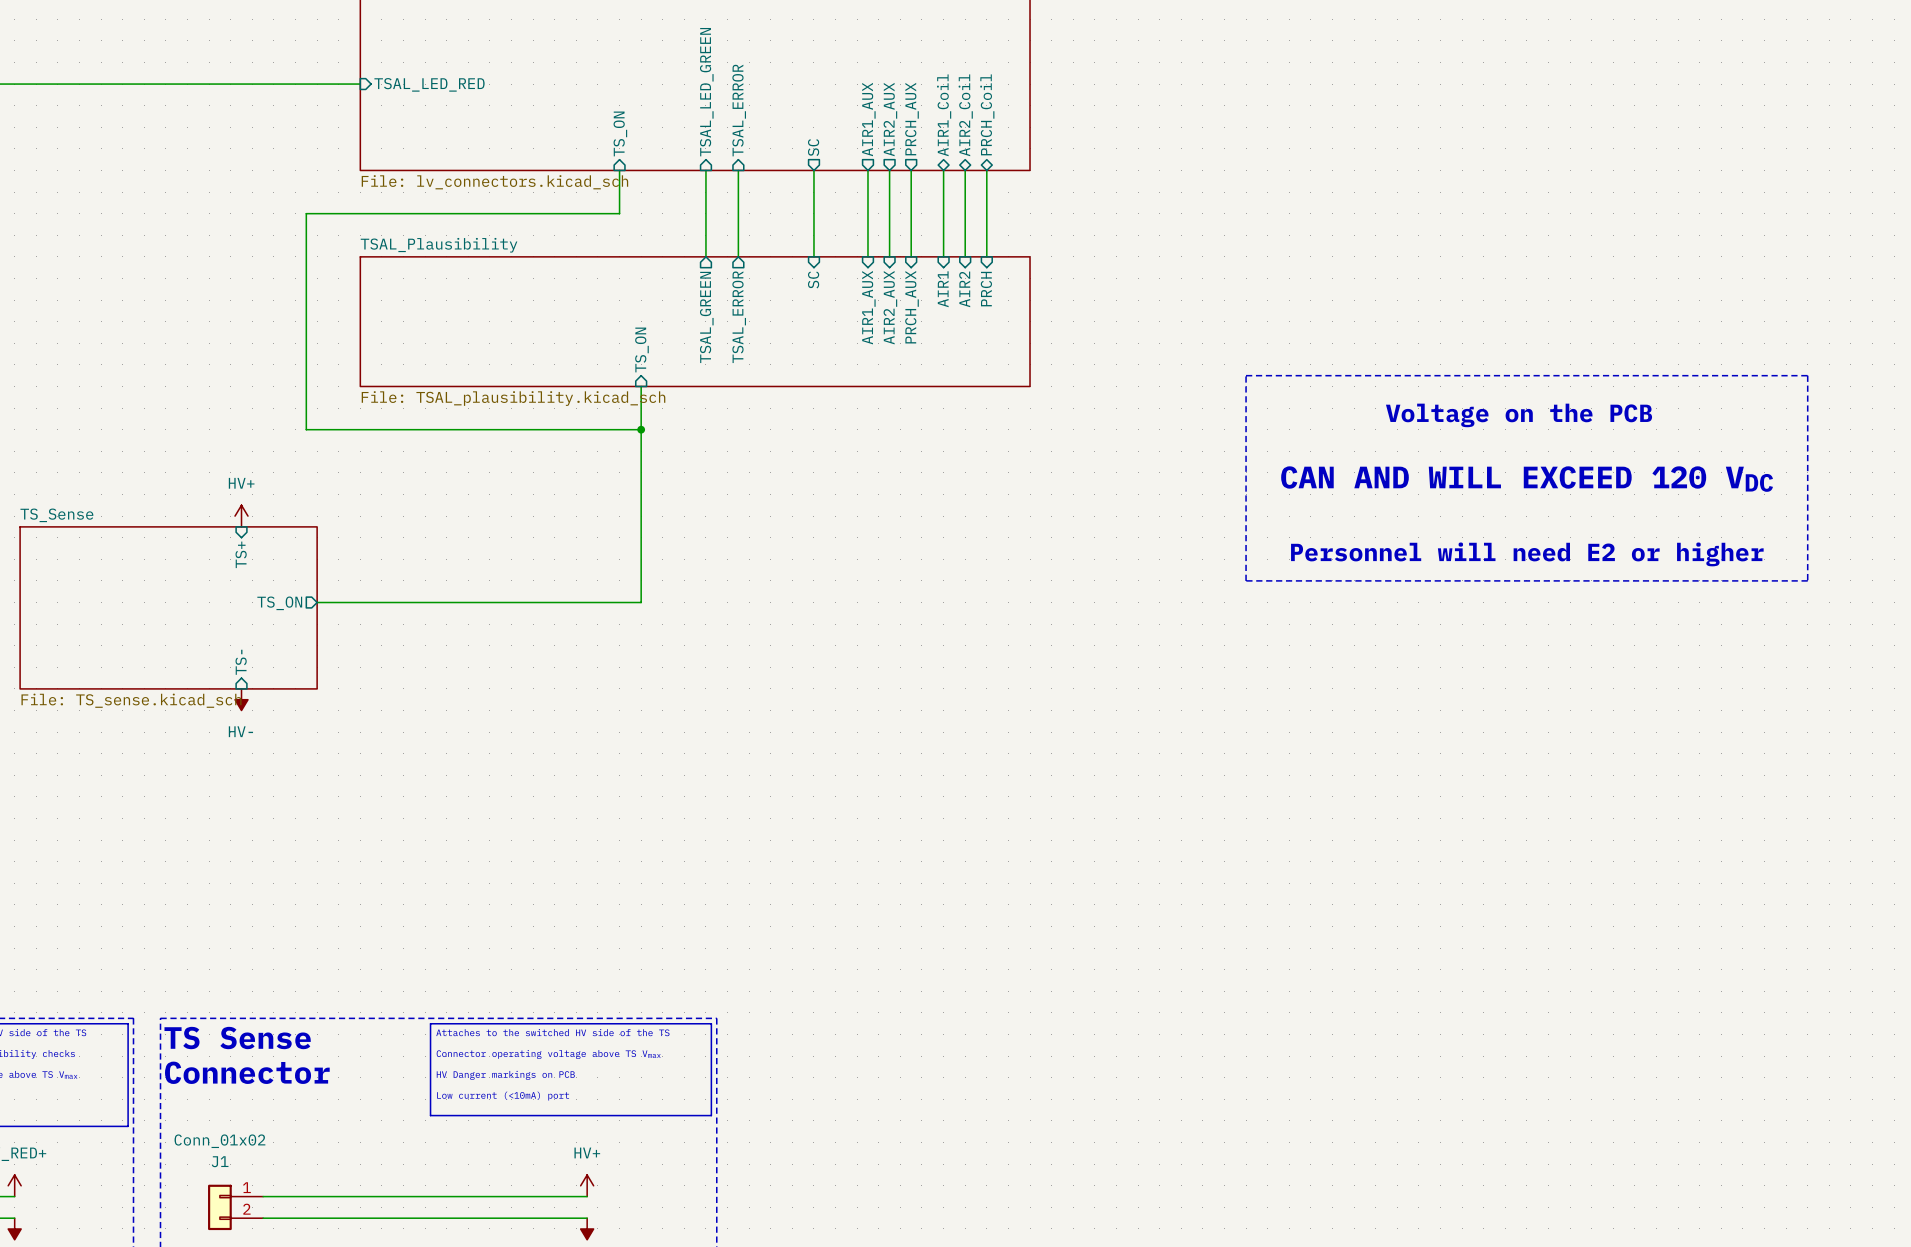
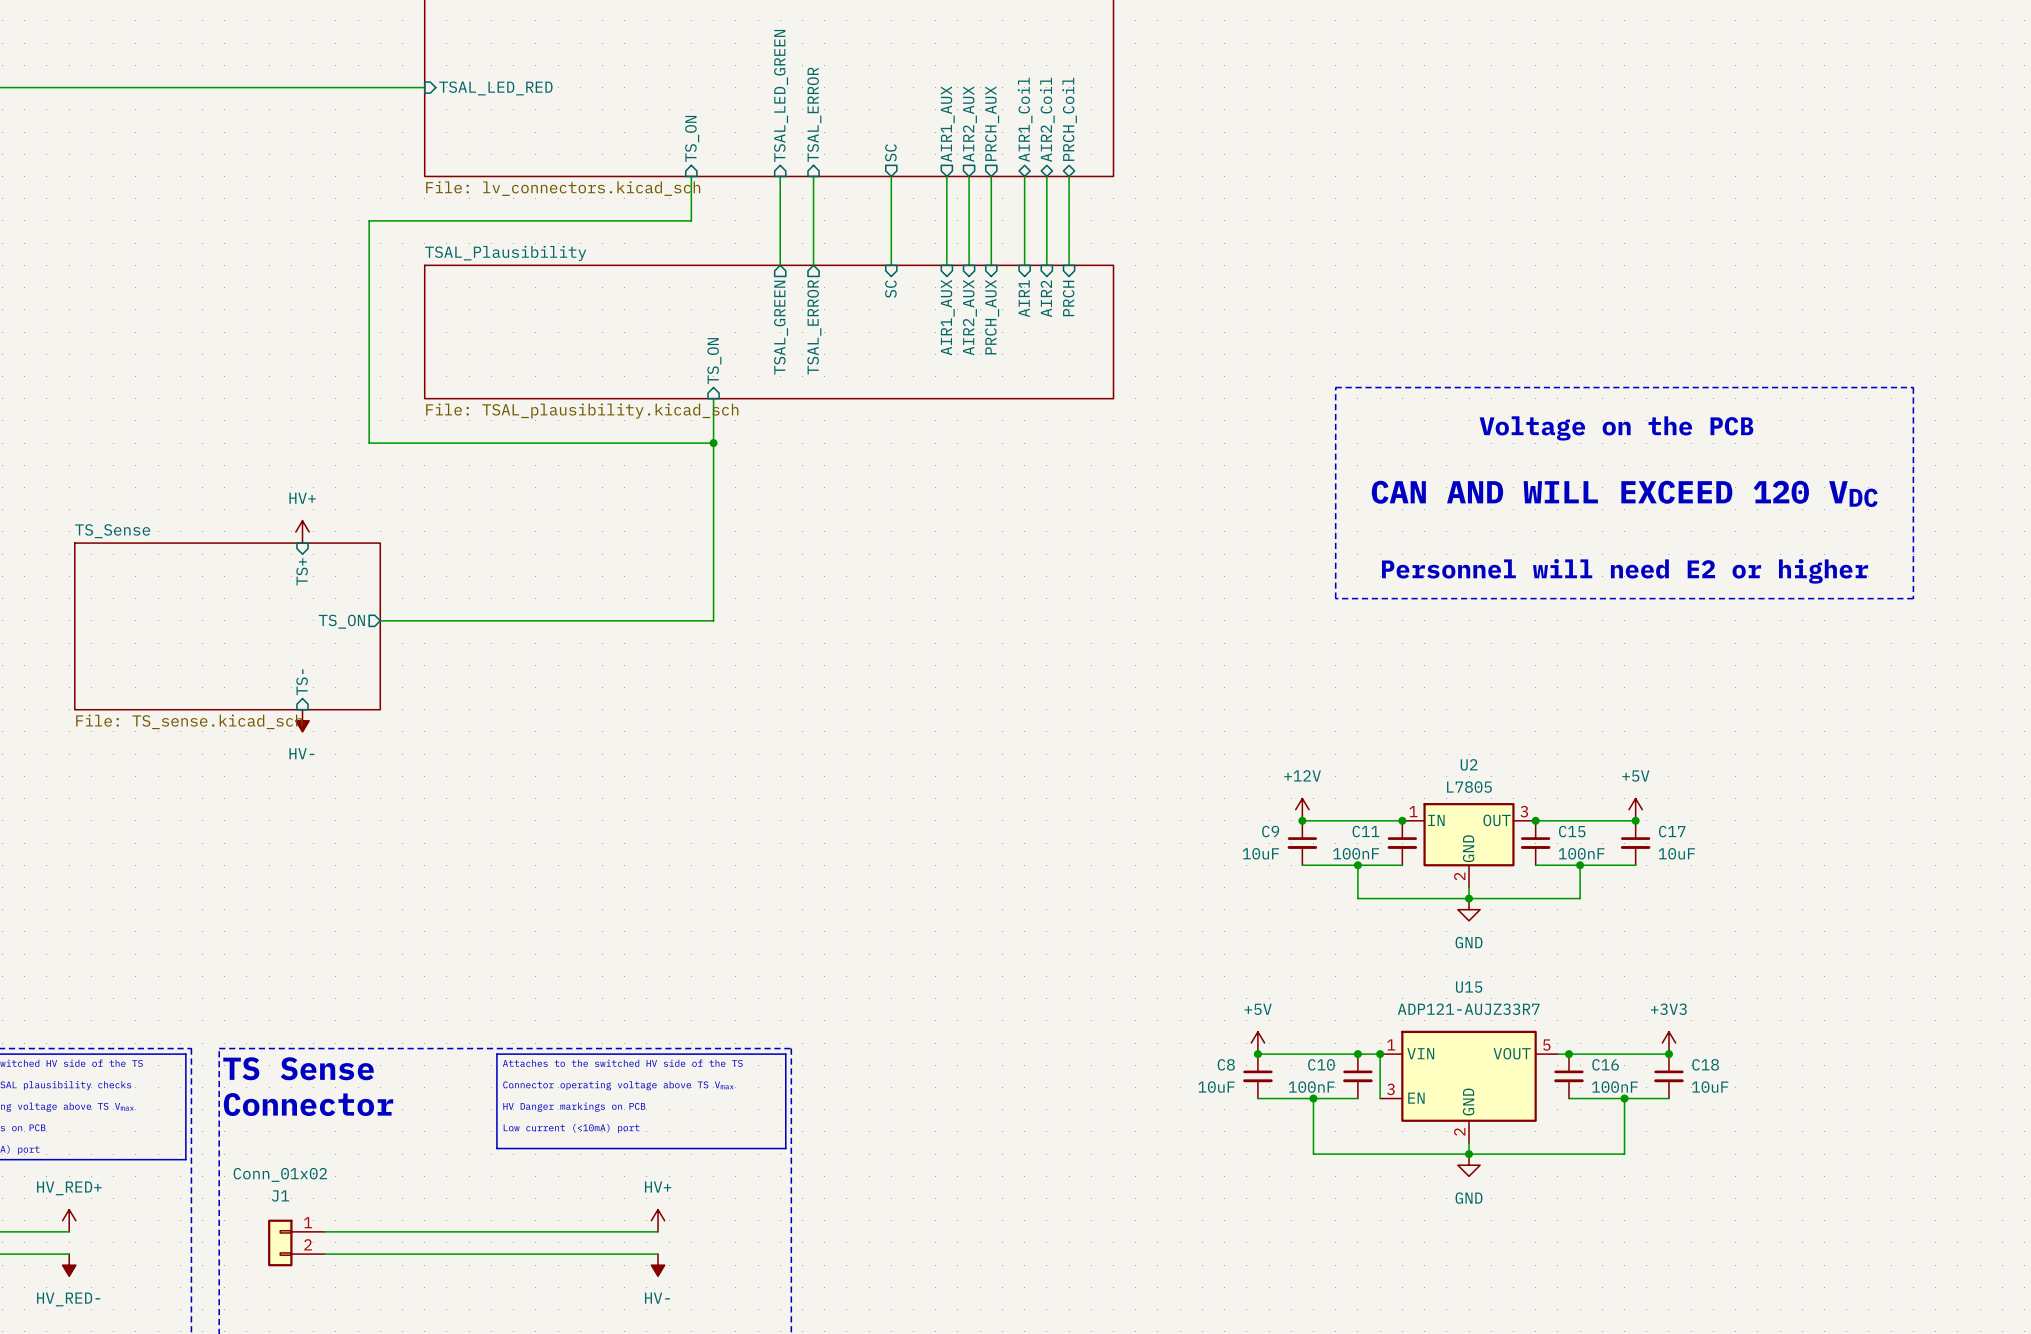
power symbol: none -> +12V (1302, 809)
power symbol: none -> +5V (1635, 809)
wire: none -> (1302, 820) (1402, 820)
junction: none -> (1302, 820)
junction: none -> (1402, 820)
wire: none -> (1535, 820) (1635, 820)
junction: none -> (1535, 820)
junction: none -> (1635, 820)
C9: none -> 10uF (1302, 843)
C11: none -> 100nF (1402, 843)
C15: none -> 100nF (1535, 843)
C17: none -> 10uF (1635, 843)
U2: none -> L7805 (1469, 845)
wire: none -> (1302, 865) (1402, 865)
wire: none -> (1357, 865) (1357, 898) (1580, 898) (1580, 865)
junction: none -> (1357, 865)
wire: none -> (1535, 865) (1635, 865)
junction: none -> (1580, 865)
wire: none -> (1469, 887) (1469, 898)
junction: none -> (1469, 898)
power symbol: none -> GND (1469, 909)
power symbol: none -> +5V (1257, 1043)
power symbol: none -> +3V3 (1668, 1043)
wire: none -> (1257, 1054) (1380, 1054) (1380, 1098)
junction: none -> (1257, 1054)
junction: none -> (1357, 1054)
junction: none -> (1380, 1054)
wire: none -> (1557, 1054) (1668, 1054)
junction: none -> (1568, 1054)
junction: none -> (1668, 1054)
C8: none -> 10uF (1257, 1076)
C10: none -> 100nF (1357, 1076)
C16: none -> 100nF (1568, 1076)
C18: none -> 10uF (1668, 1076)
U15: none -> ADP121-AUJZ33R7 (1469, 1086)
wire: none -> (1257, 1098) (1357, 1098)
wire: none -> (1313, 1098) (1313, 1154) (1624, 1154) (1624, 1098)
junction: none -> (1313, 1098)
wire: none -> (1568, 1098) (1668, 1098)
junction: none -> (1624, 1098)
wire: none -> (1469, 1142) (1469, 1154)
junction: none -> (1469, 1154)
power symbol: none -> GND (1469, 1165)

